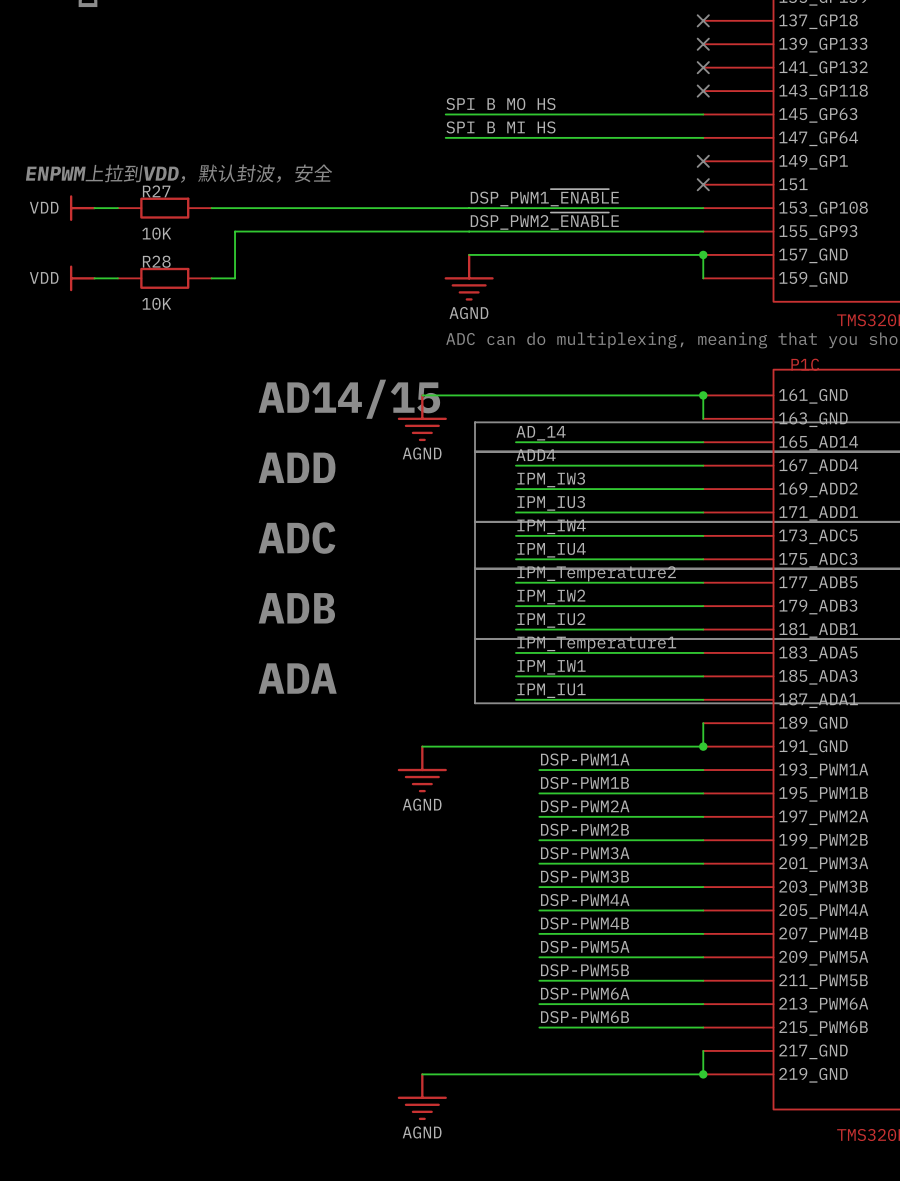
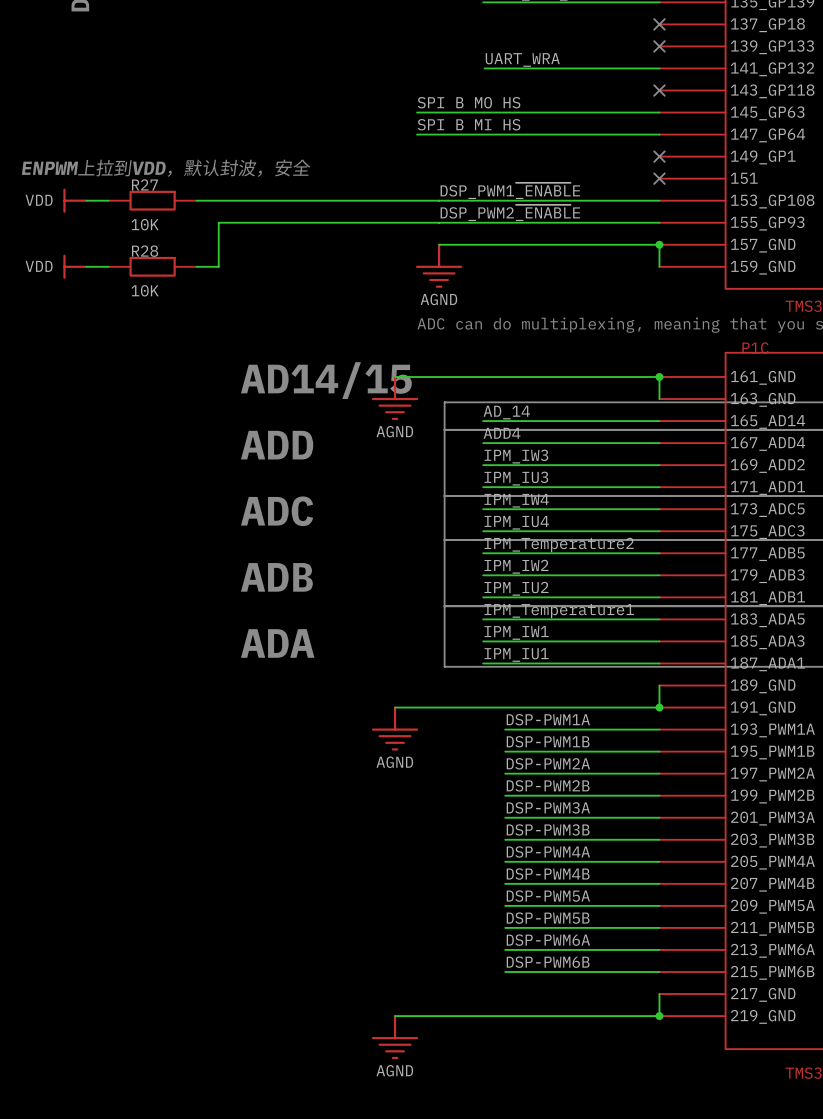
label: none -> UART_WRA (522, 59)
wire: none -> (484, 68) (659, 68)
no-connect mark: (703, 67) -> none

